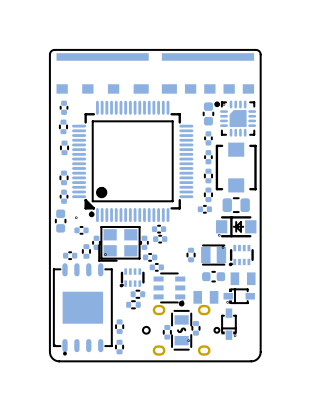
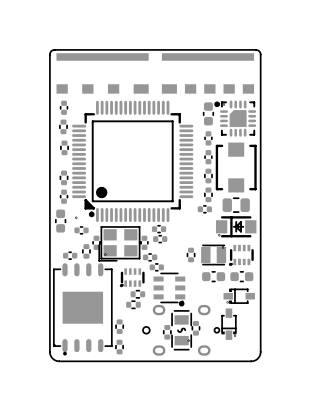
part footprint: [230, 272, 256, 286] -> [230, 271, 254, 283]
part: (205, 297) -> none

